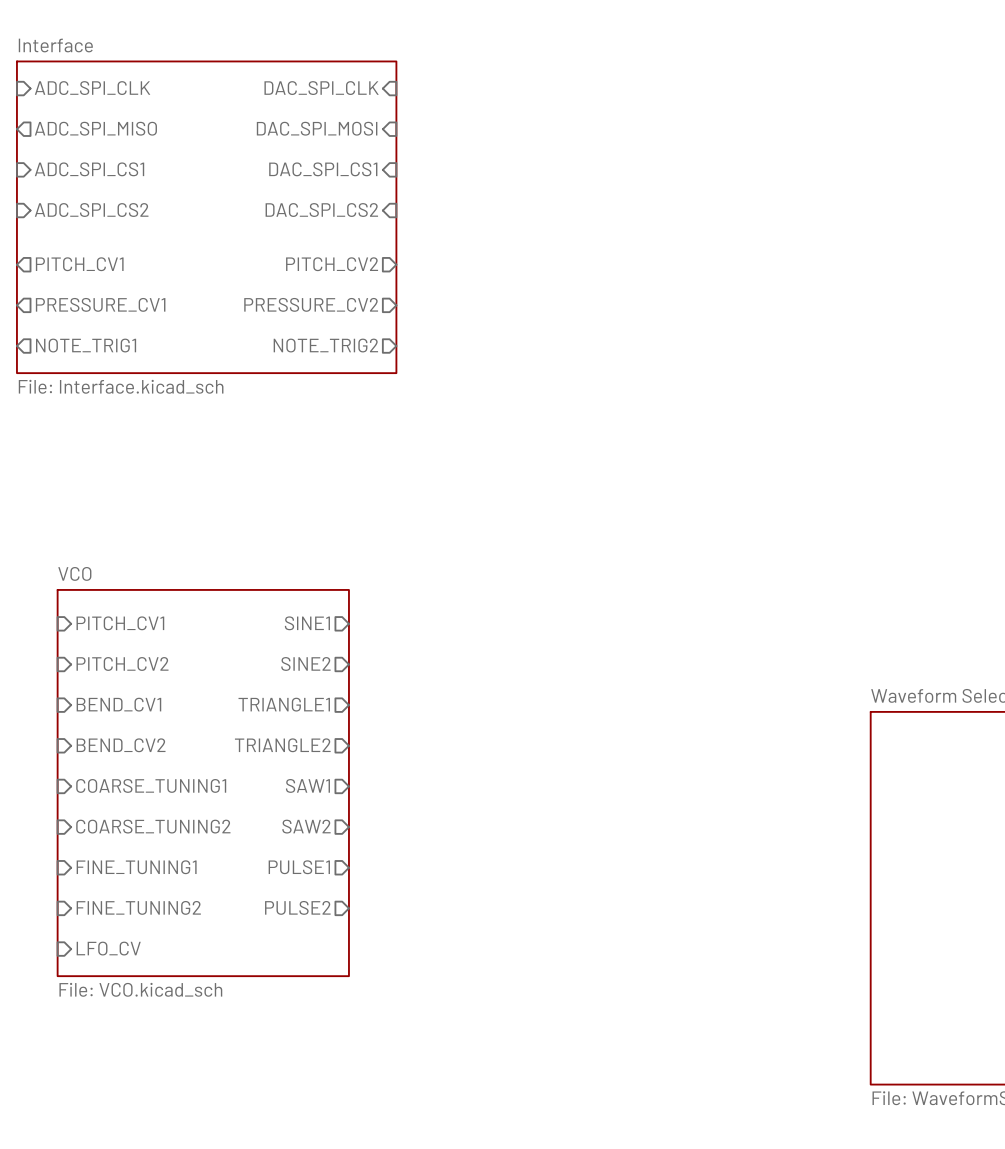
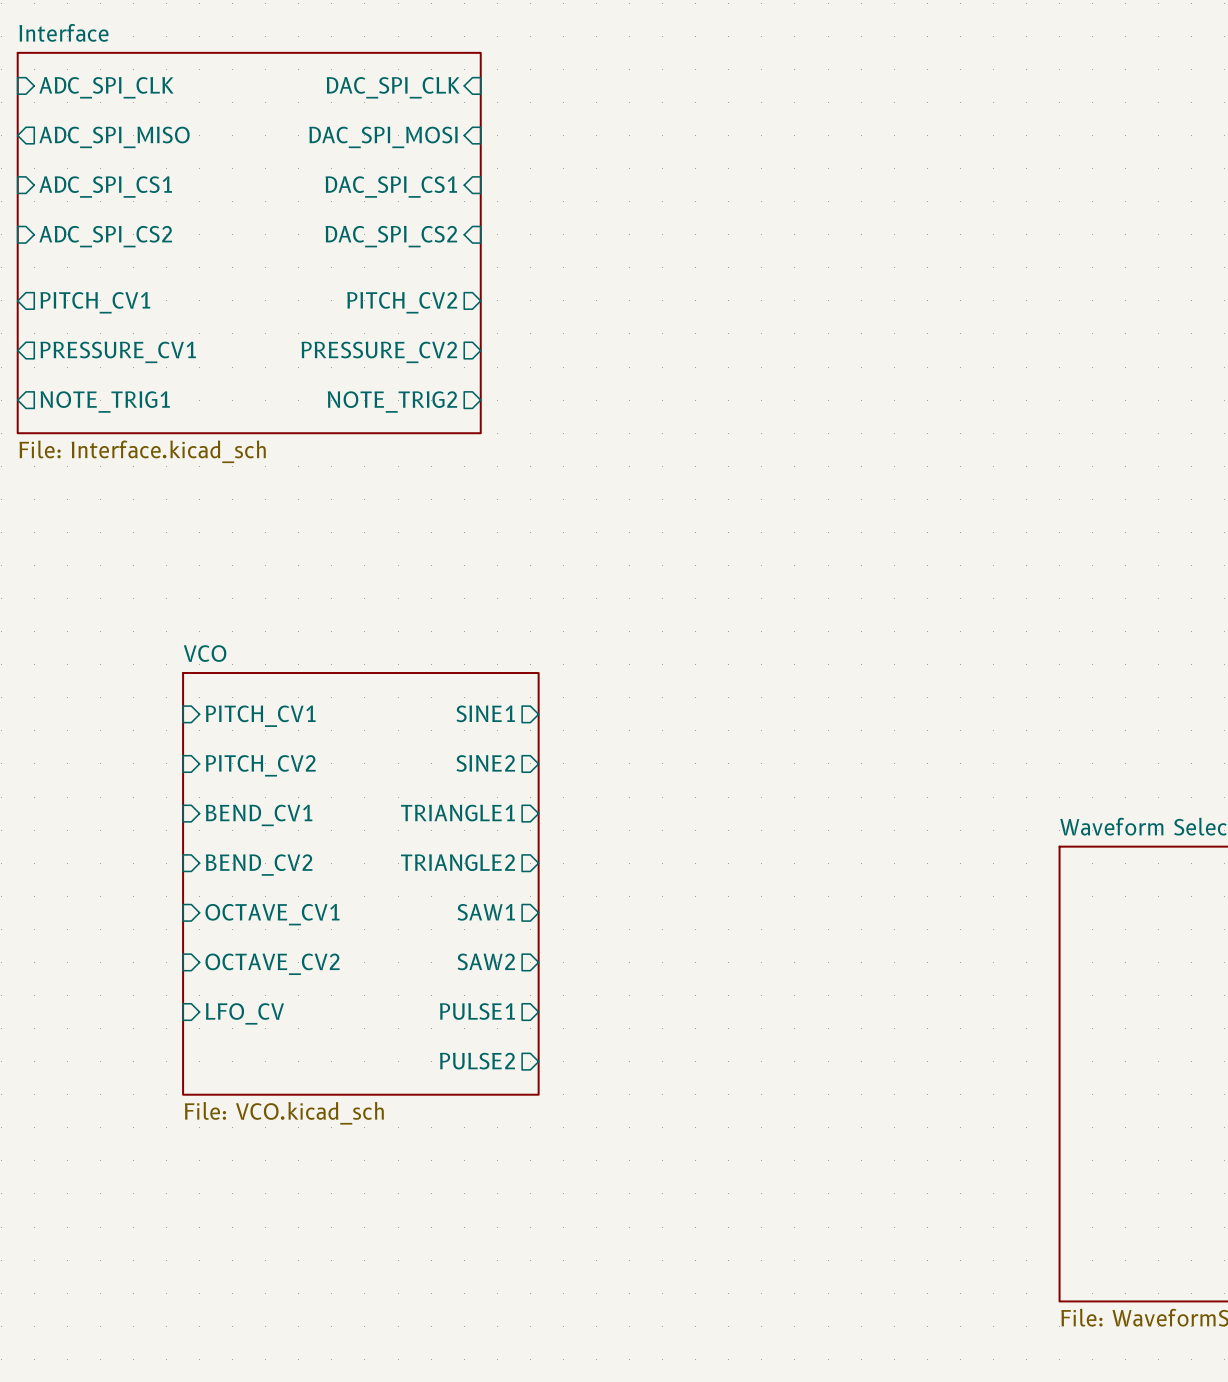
sheet pin position: PITCH_CV1 (120, 623) -> PITCH_CV1 (260, 716)
sheet pin position: SINE1 (307, 623) -> SINE1 (485, 713)
sheet pin position: PITCH_CV2 (122, 663) -> PITCH_CV2 (260, 765)
sheet pin position: SINE2 (305, 663) -> SINE2 (485, 763)
sheet pin position: BEND_CV1 (118, 704) -> BEND_CV1 (259, 815)
sheet pin position: TRIANGLE1 (284, 704) -> TRIANGLE1 (457, 813)
sheet VCO: none -> File: VCO.kicad_sch (360, 883)
sheet pin position: BEND_CV2 (121, 745) -> BEND_CV2 (259, 865)
sheet pin position: TRIANGLE2 (282, 745) -> TRIANGLE2 (457, 862)
sheet pin: none -> OCTAVE_CV1 (272, 914)
sheet VCO: File: VCO.kicad_sch (203, 783) -> none
sheet pin: COARSE_TUNING1 (151, 785) -> none
sheet pin position: SAW1 (307, 785) -> SAW1 (486, 912)
sheet pin: none -> OCTAVE_CV2 (272, 964)
sheet pin: COARSE_TUNING2 (153, 826) -> none
sheet pin position: SAW2 (306, 826) -> SAW2 (486, 961)
sheet pin: FINE_TUNING1 (136, 867) -> none
sheet pin position: PULSE1 (299, 867) -> PULSE1 (477, 1011)
sheet pin: FINE_TUNING2 (138, 907) -> none
sheet pin position: PULSE2 (297, 907) -> PULSE2 (477, 1061)
sheet pin position: LFO_CV (108, 948) -> LFO_CV (244, 1013)

